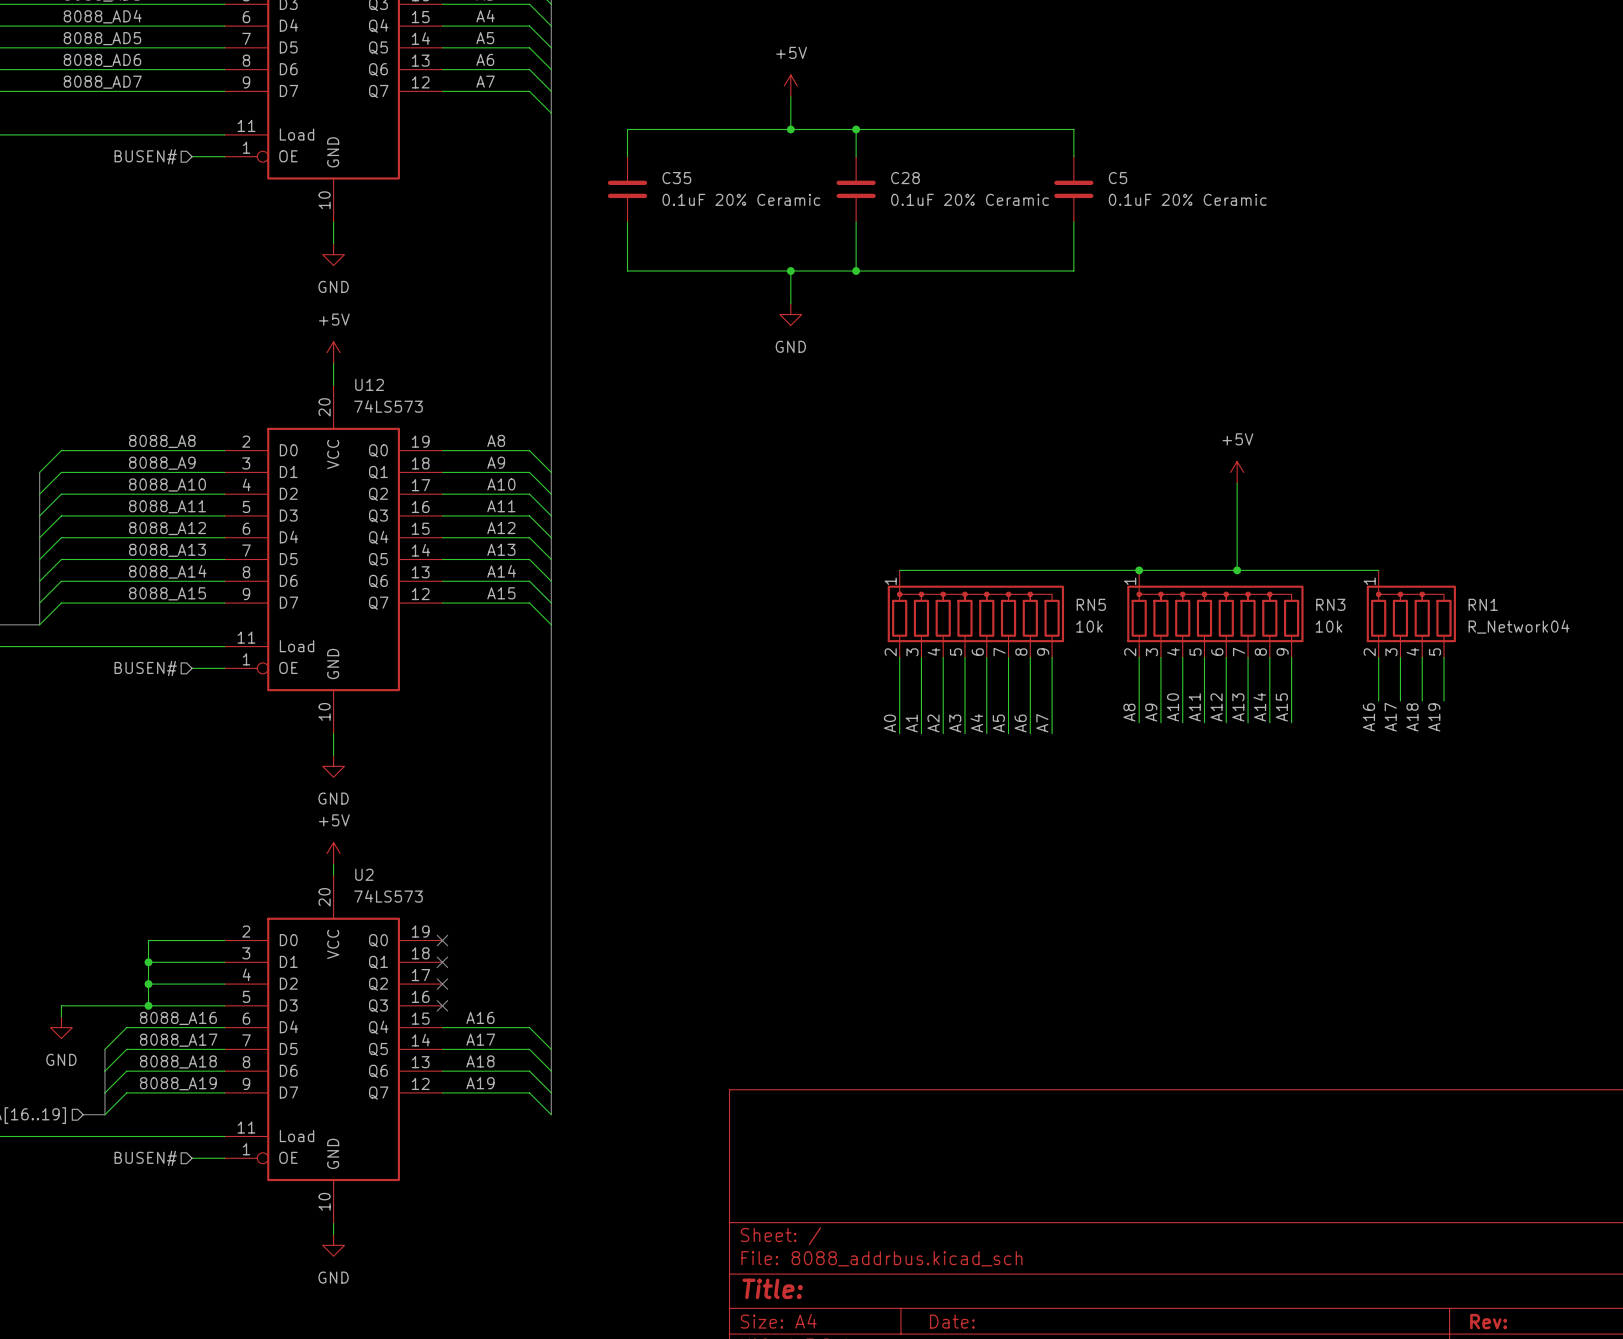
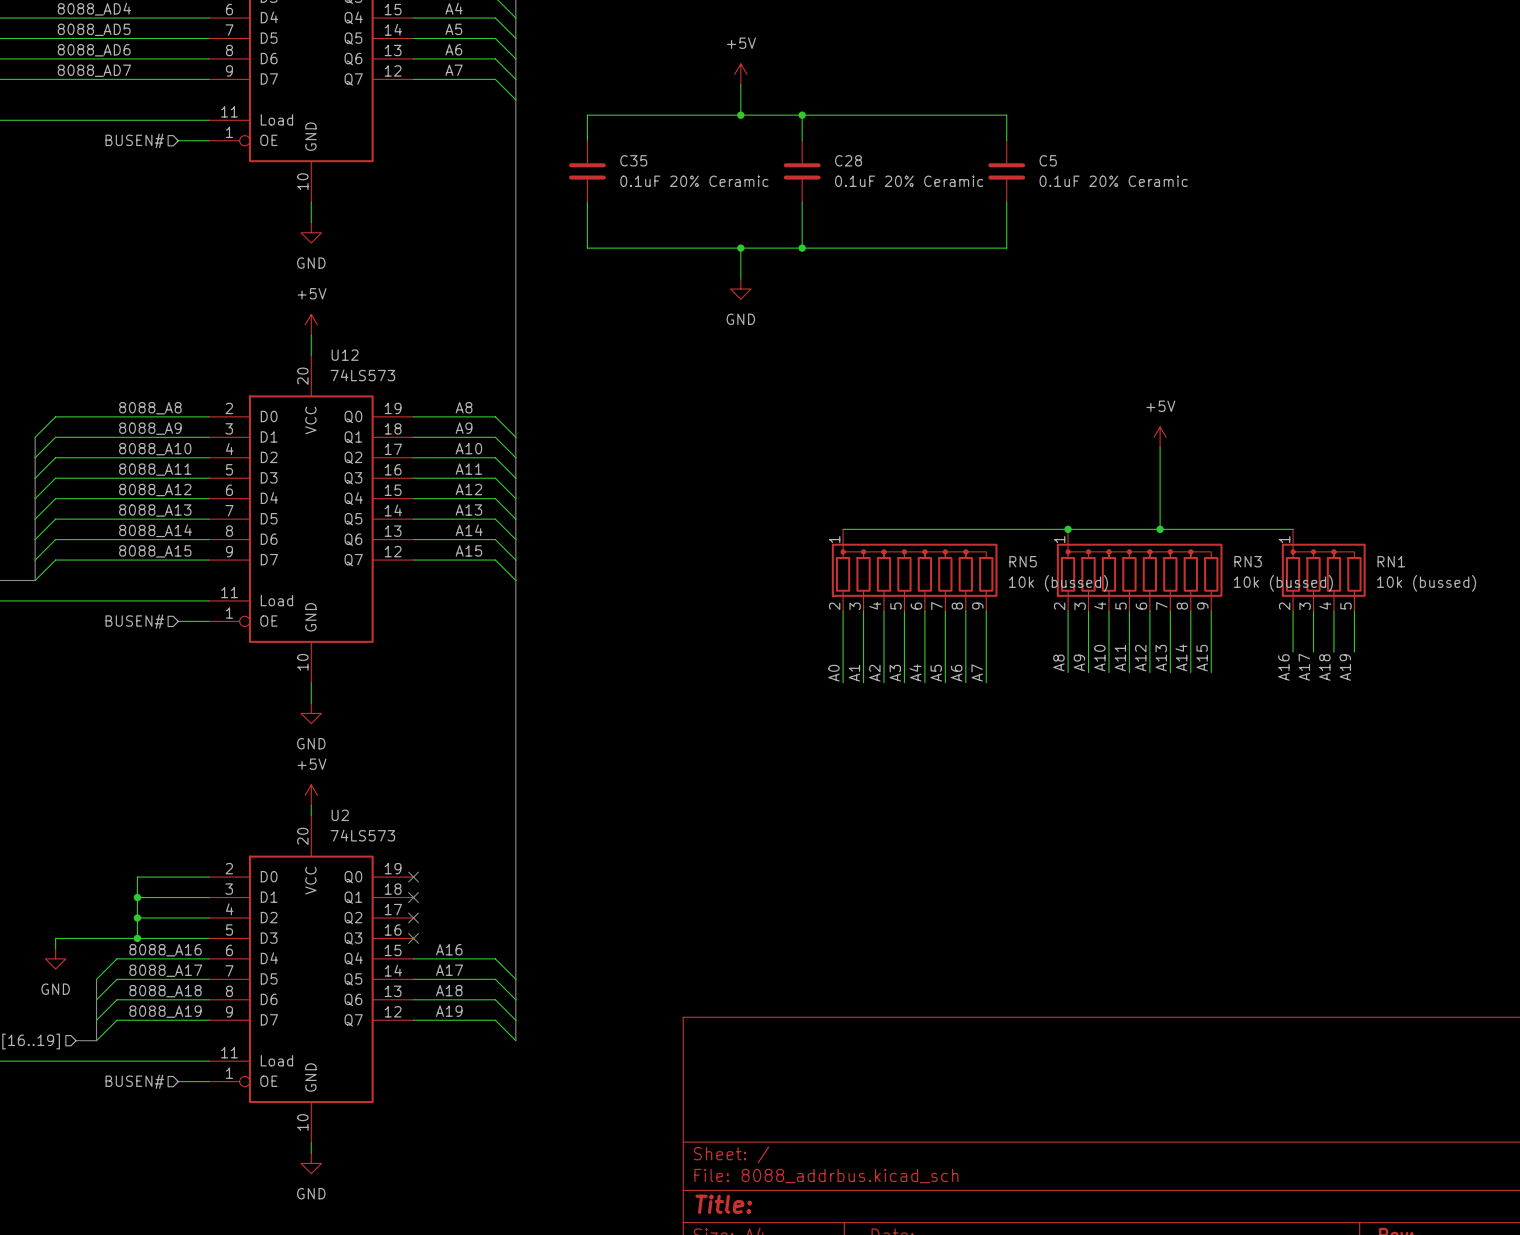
RN5 value: 10k (1089, 626) -> 10k (bussed) (1058, 583)
RN3 value: 10k (1328, 626) -> 10k (bussed) (1283, 583)
RN1 value: R_Network04 (1518, 626) -> 10k (bussed) (1426, 583)

